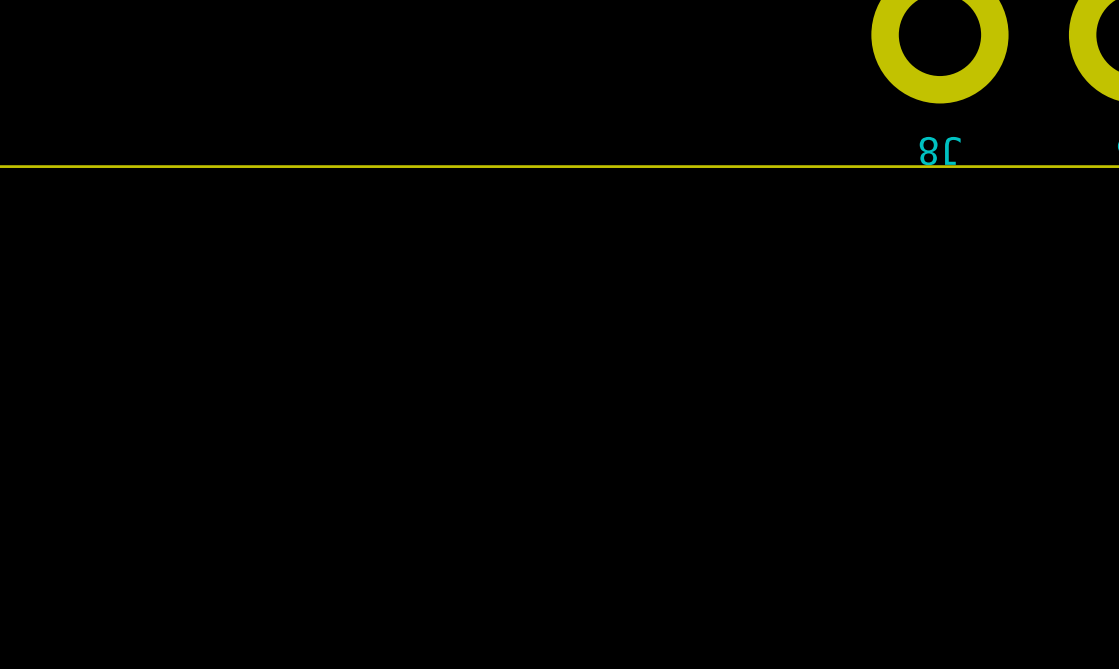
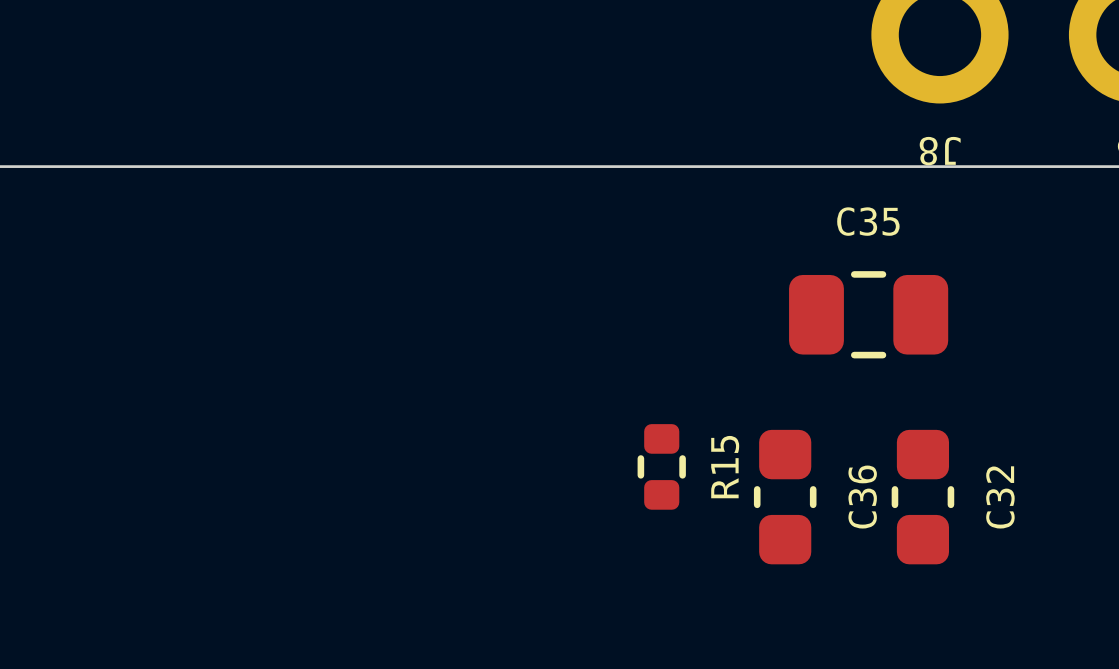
C35: none -> (868, 314)
R15: none -> (661, 466)
C36: none -> (785, 497)
C32: none -> (922, 497)

